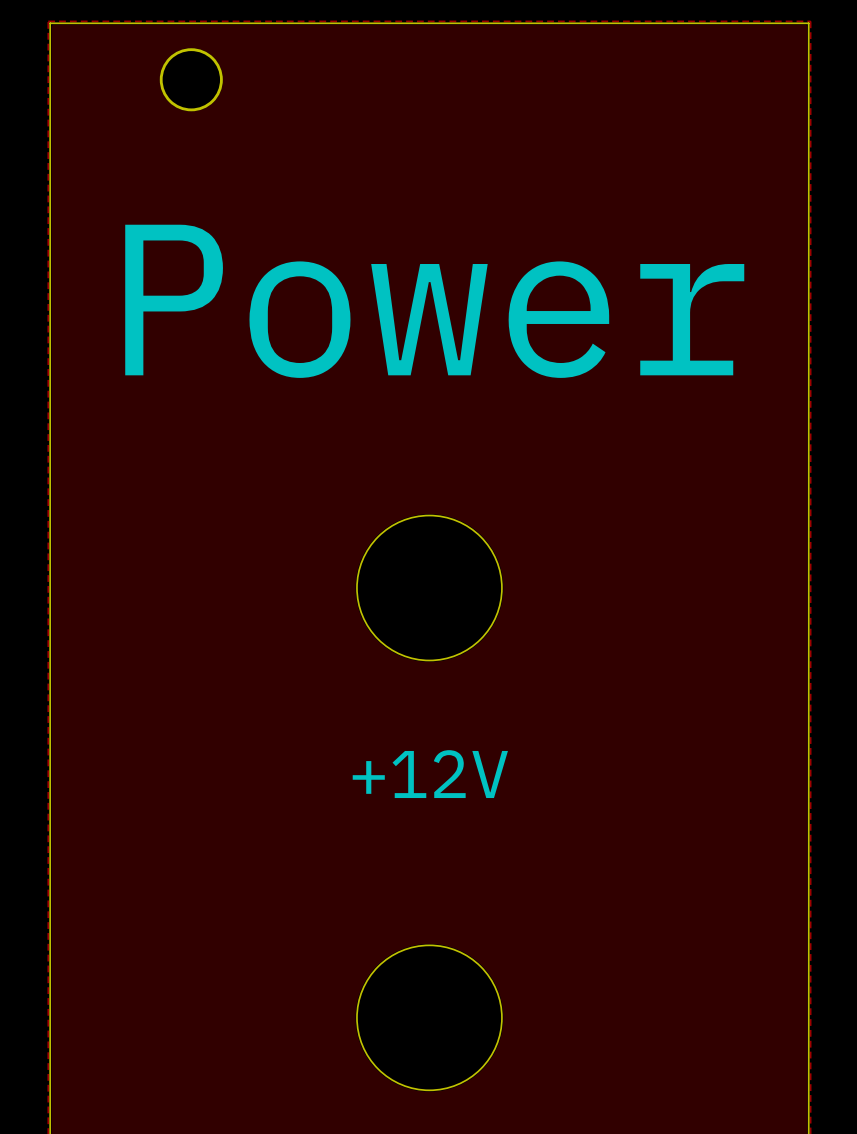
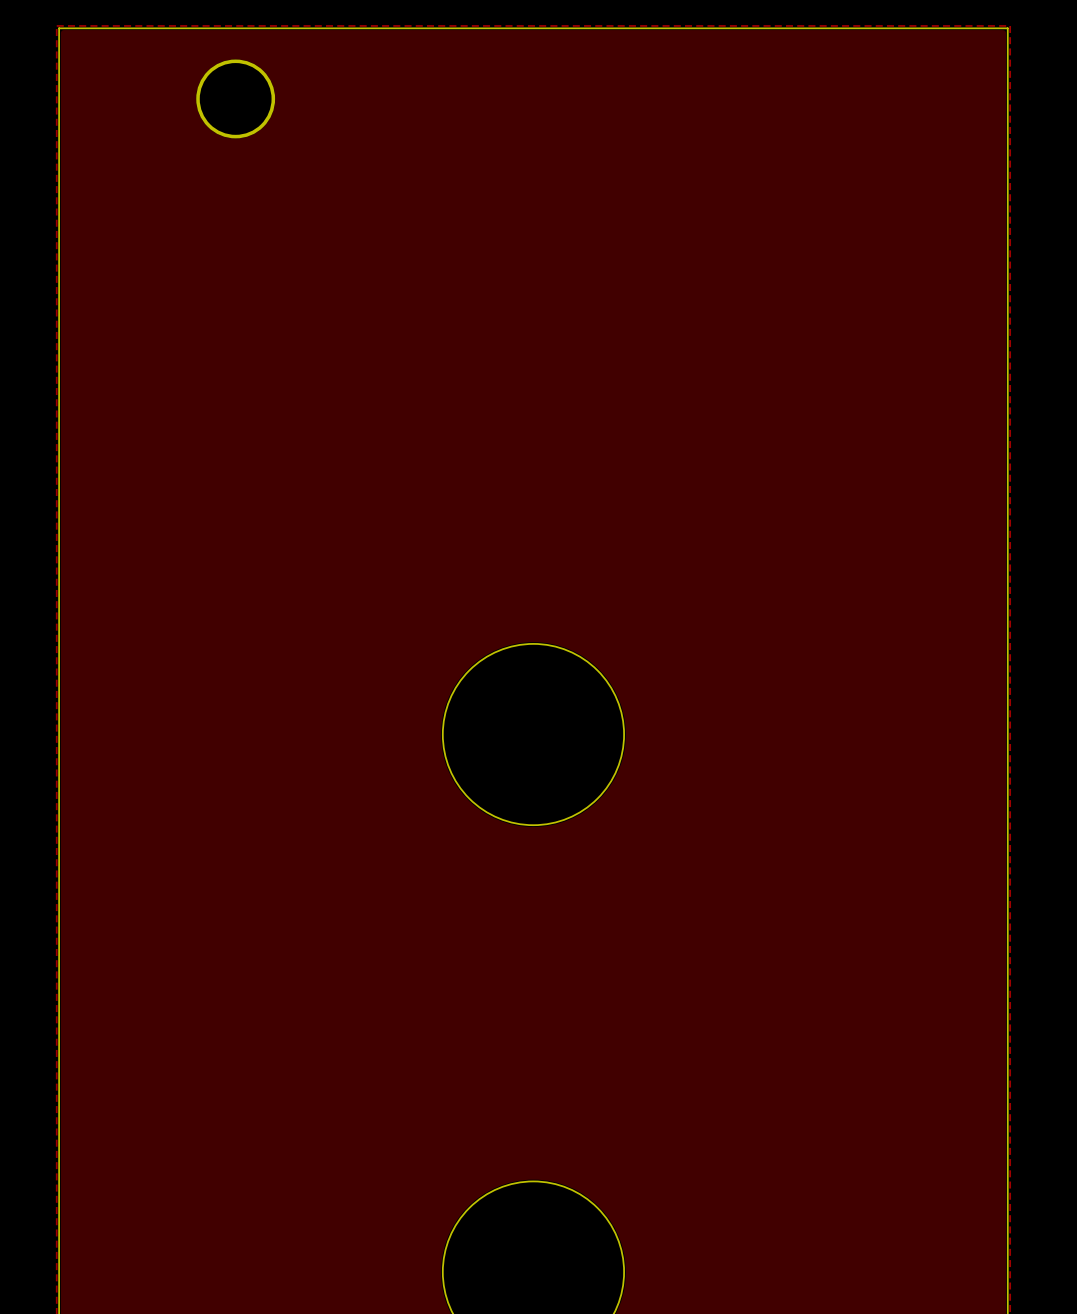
text: Power (434, 301) -> none
text: +12V (430, 774) -> none

